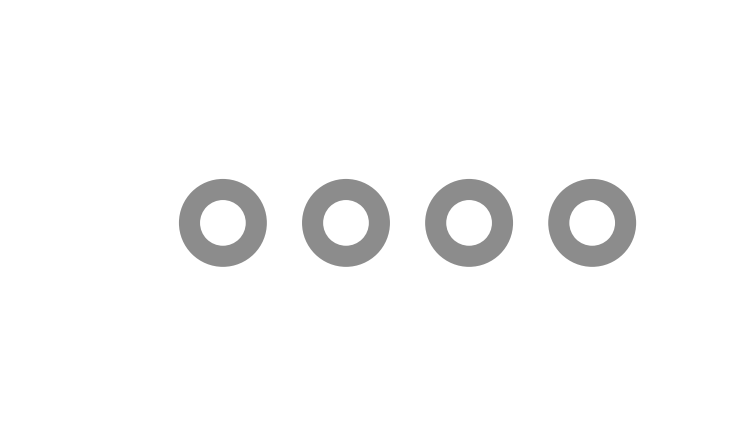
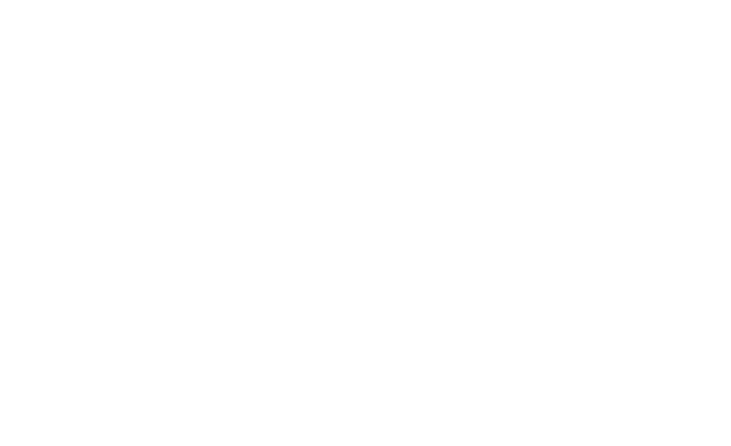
part: (407, 222) -> none

